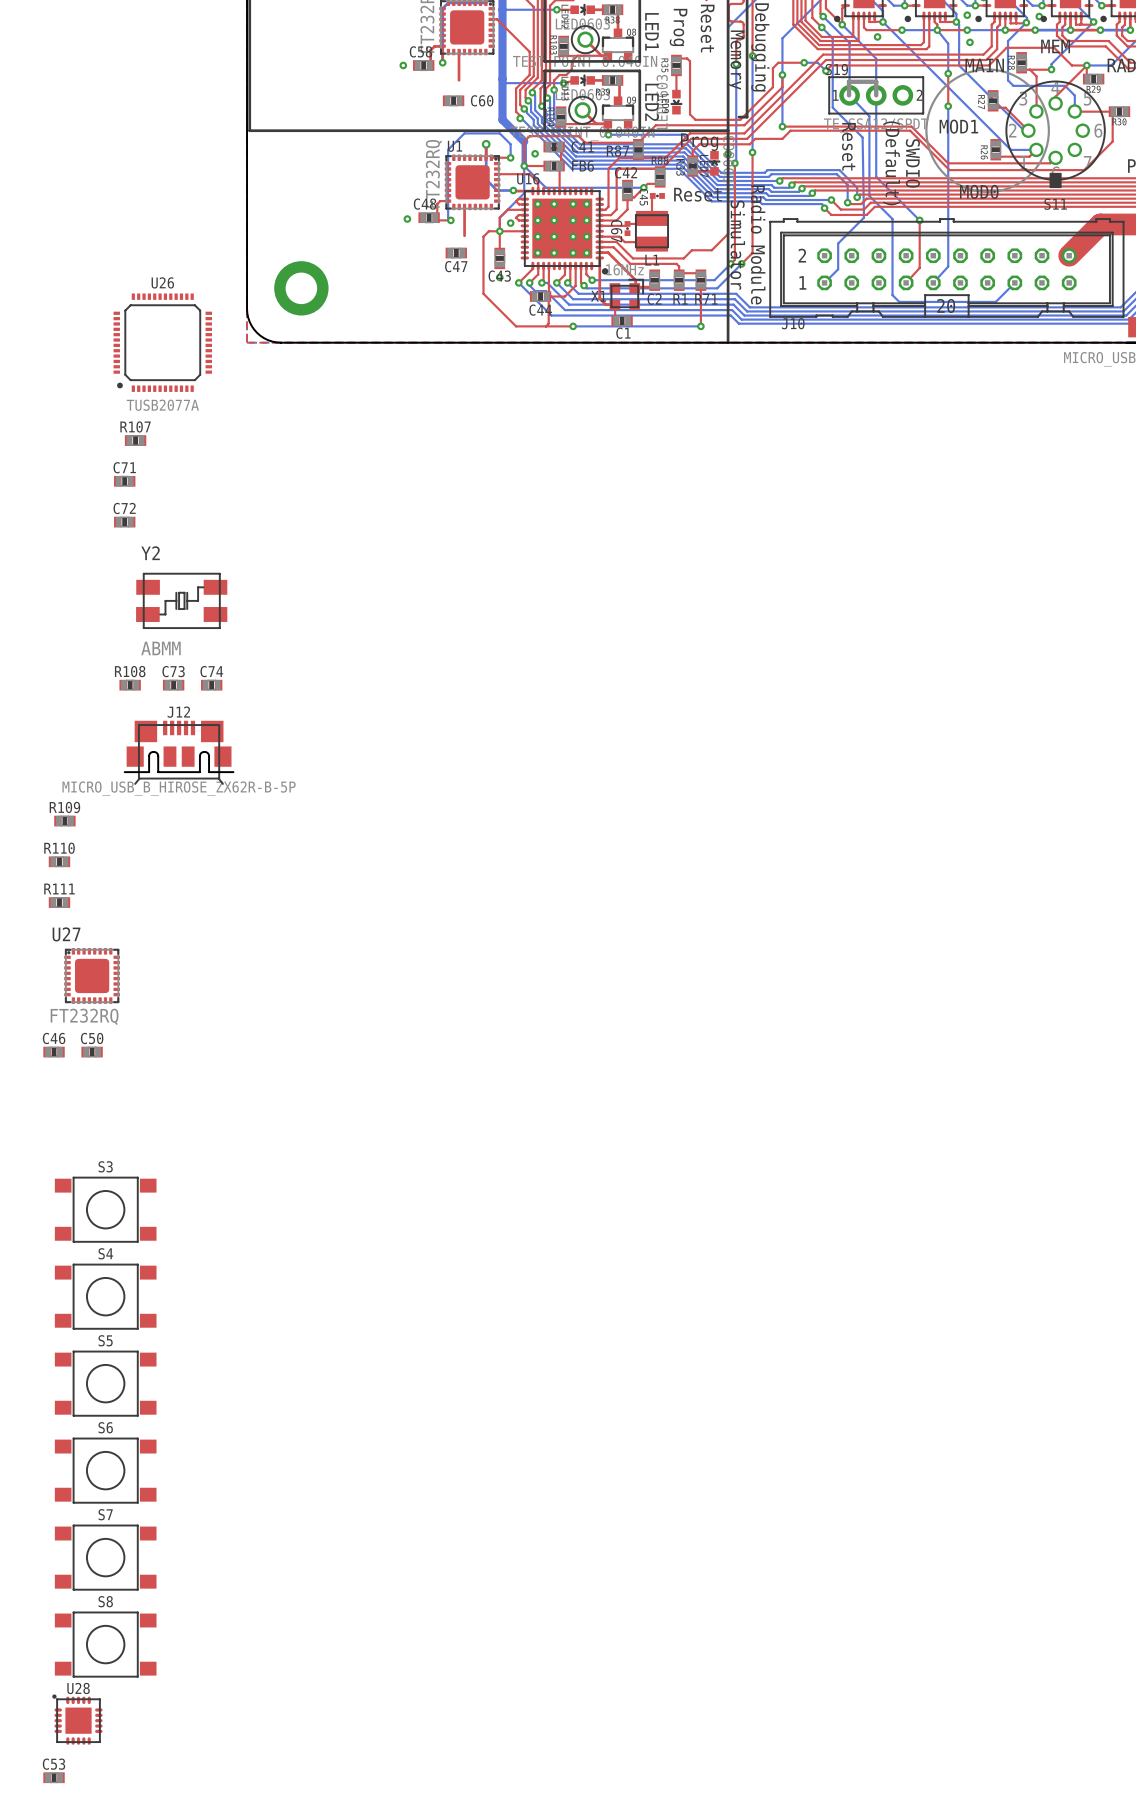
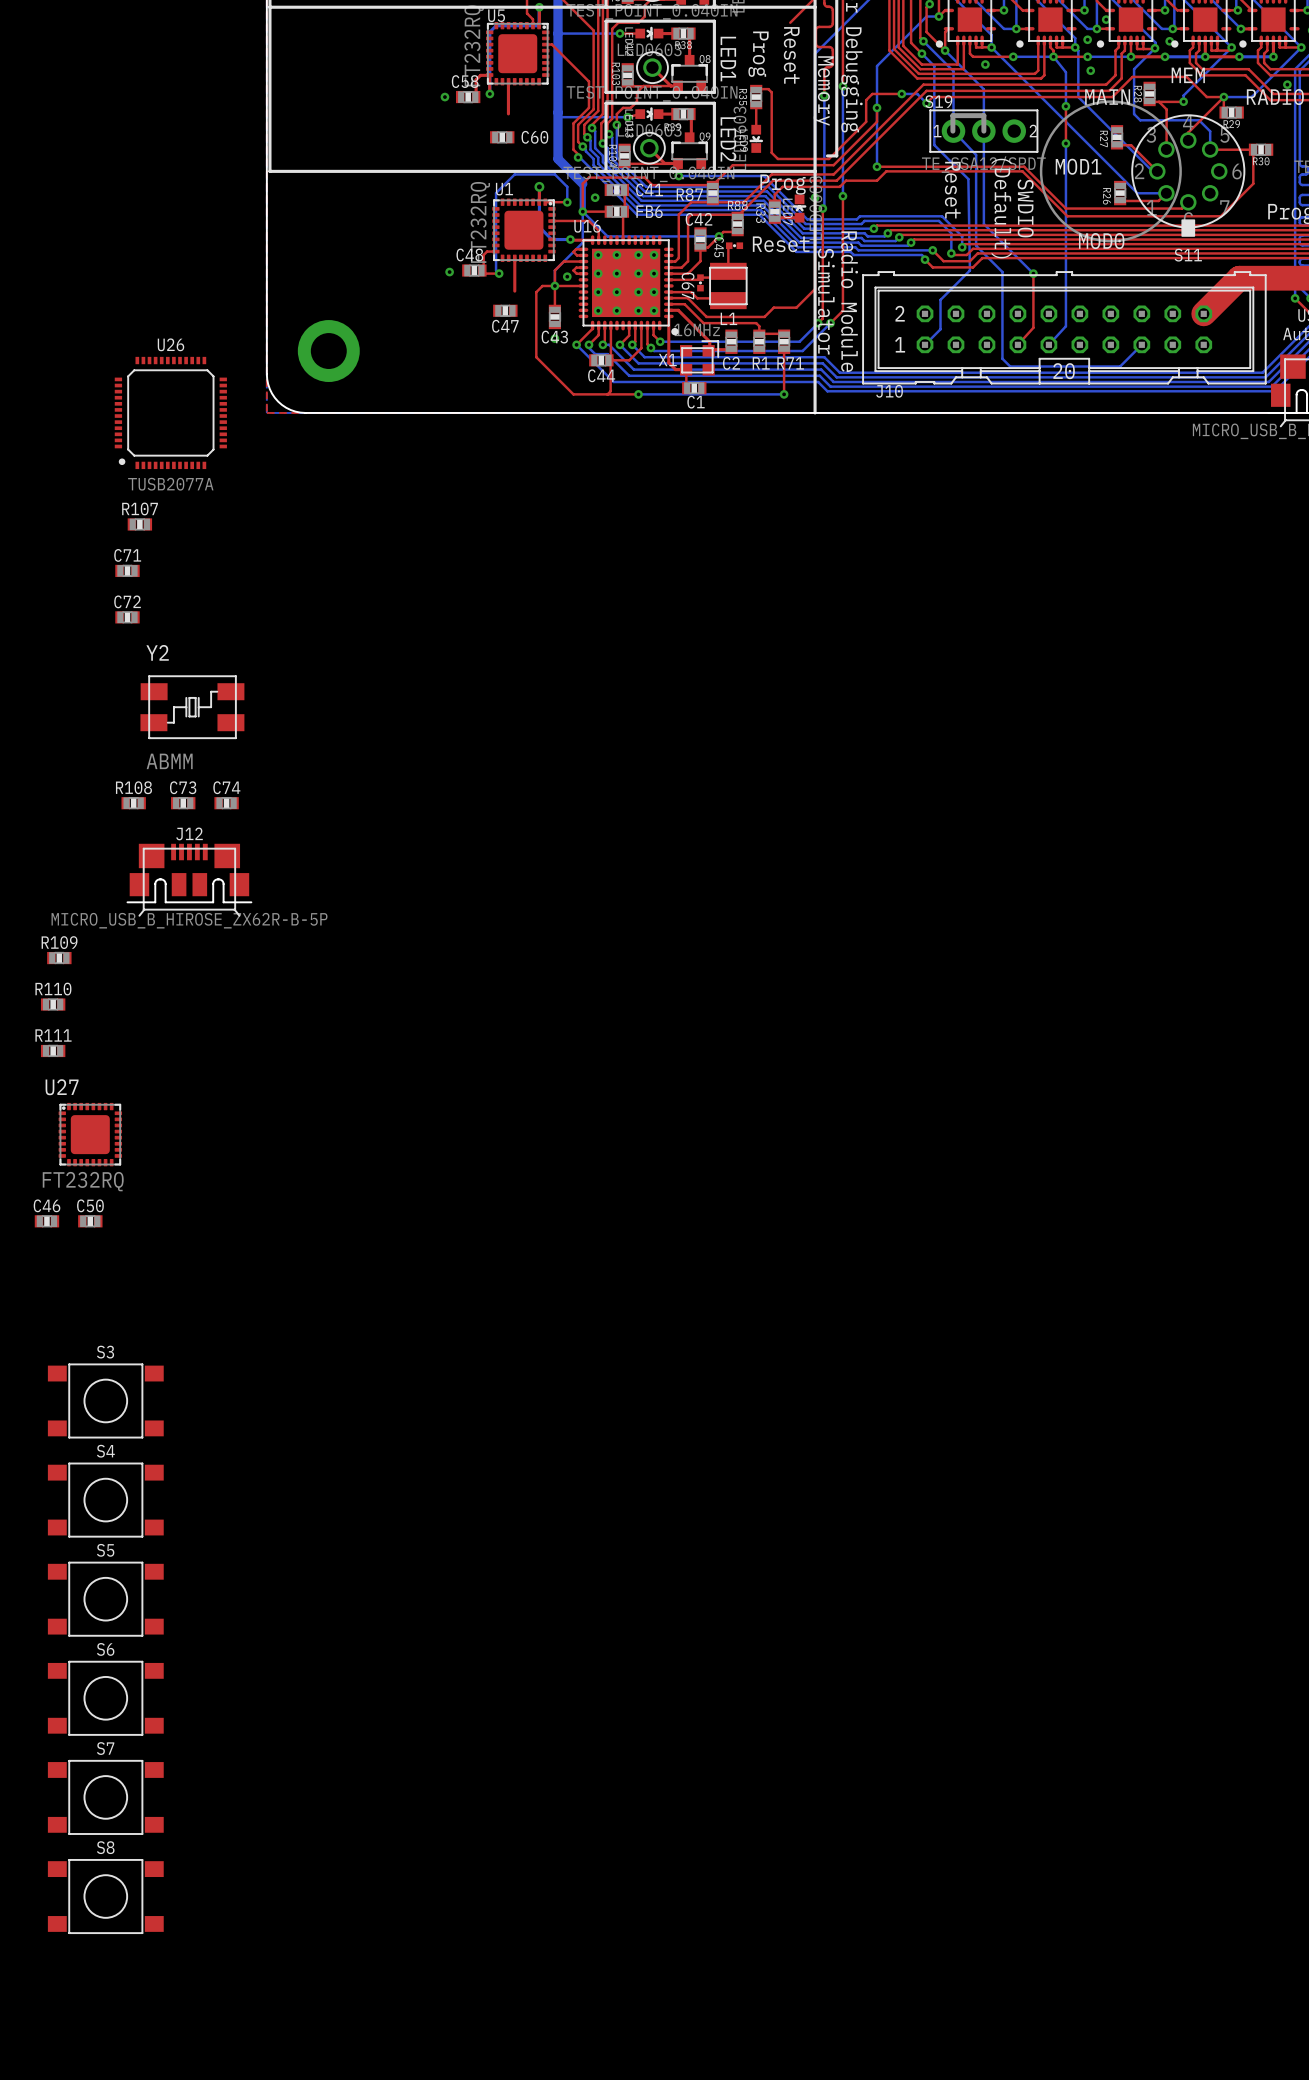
U28: (77, 1719) -> none
C53: (54, 1777) -> none

